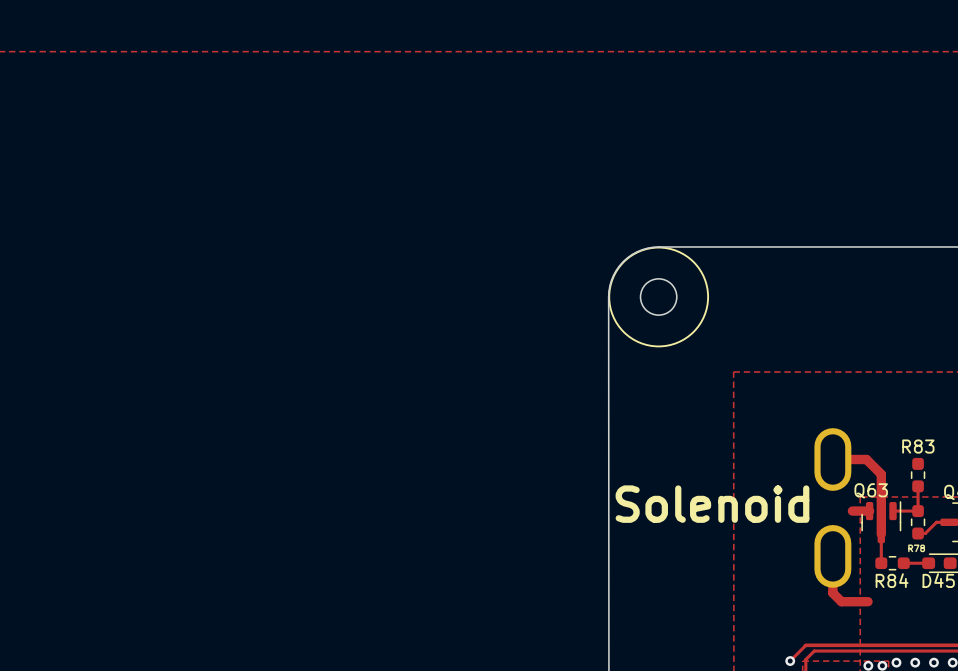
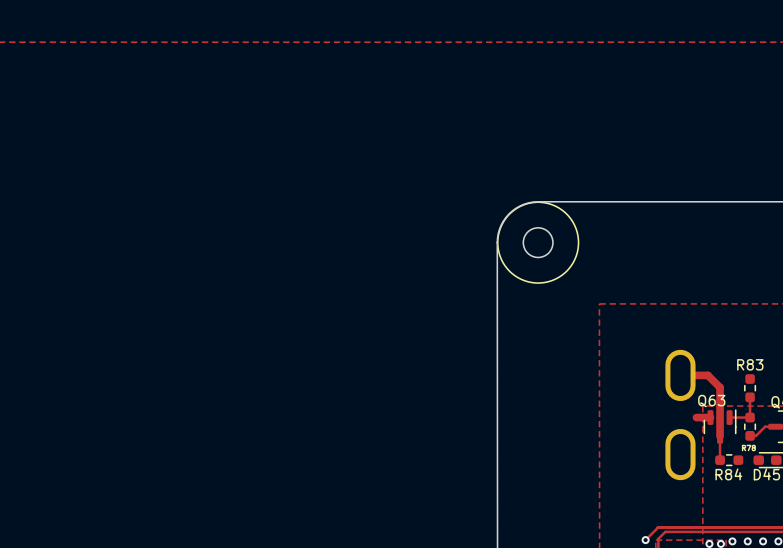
text: Solenoid (712, 504) -> none
track: (832, 556) (832, 593) (841, 601) (868, 601) -> none
track: (903, 563) (928, 563) -> none

